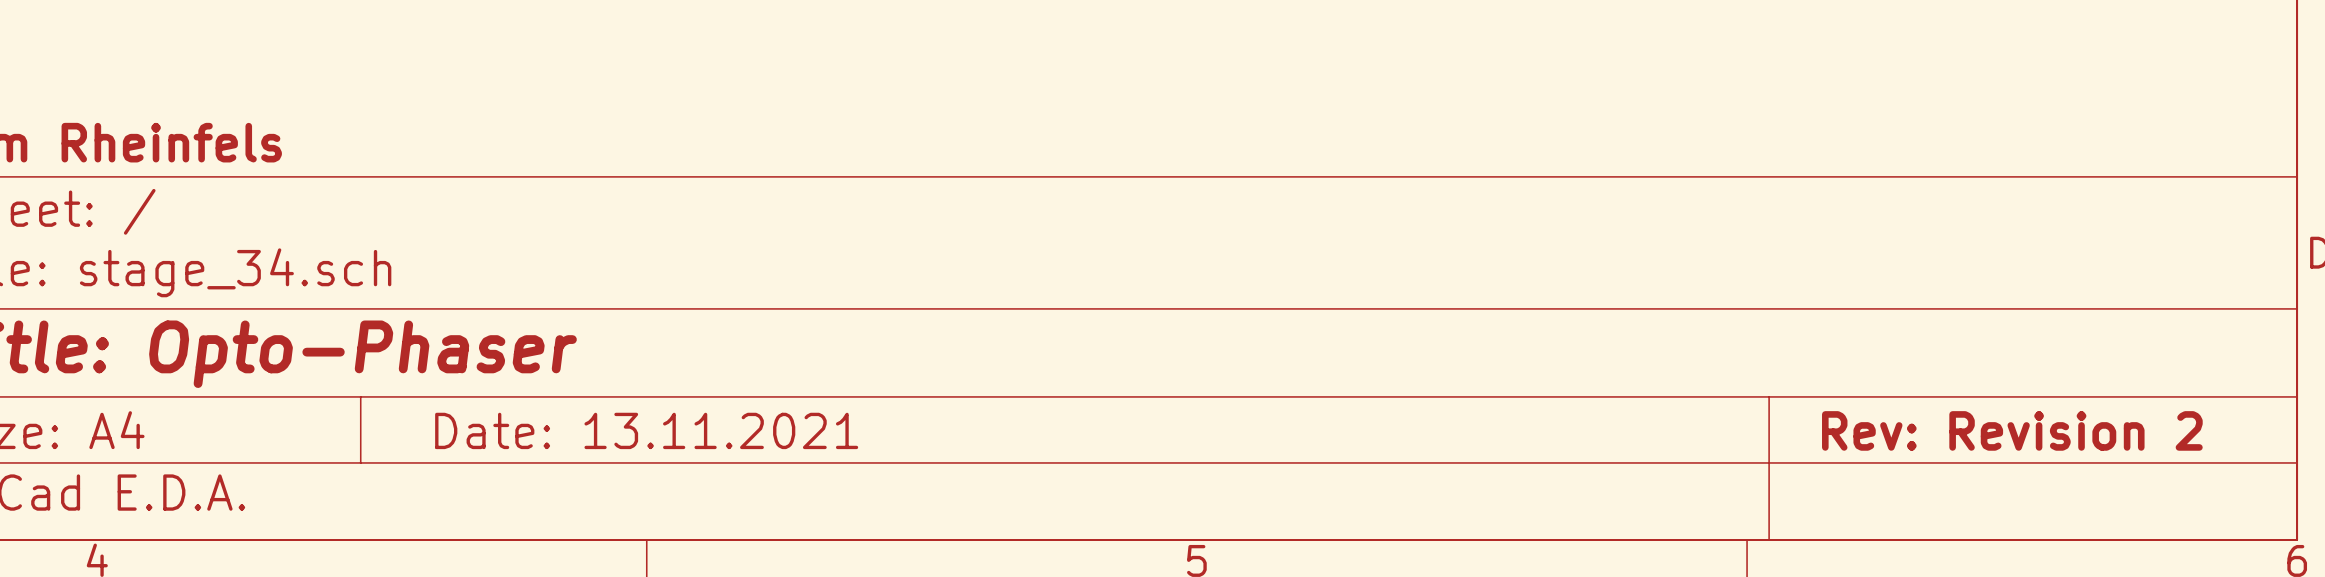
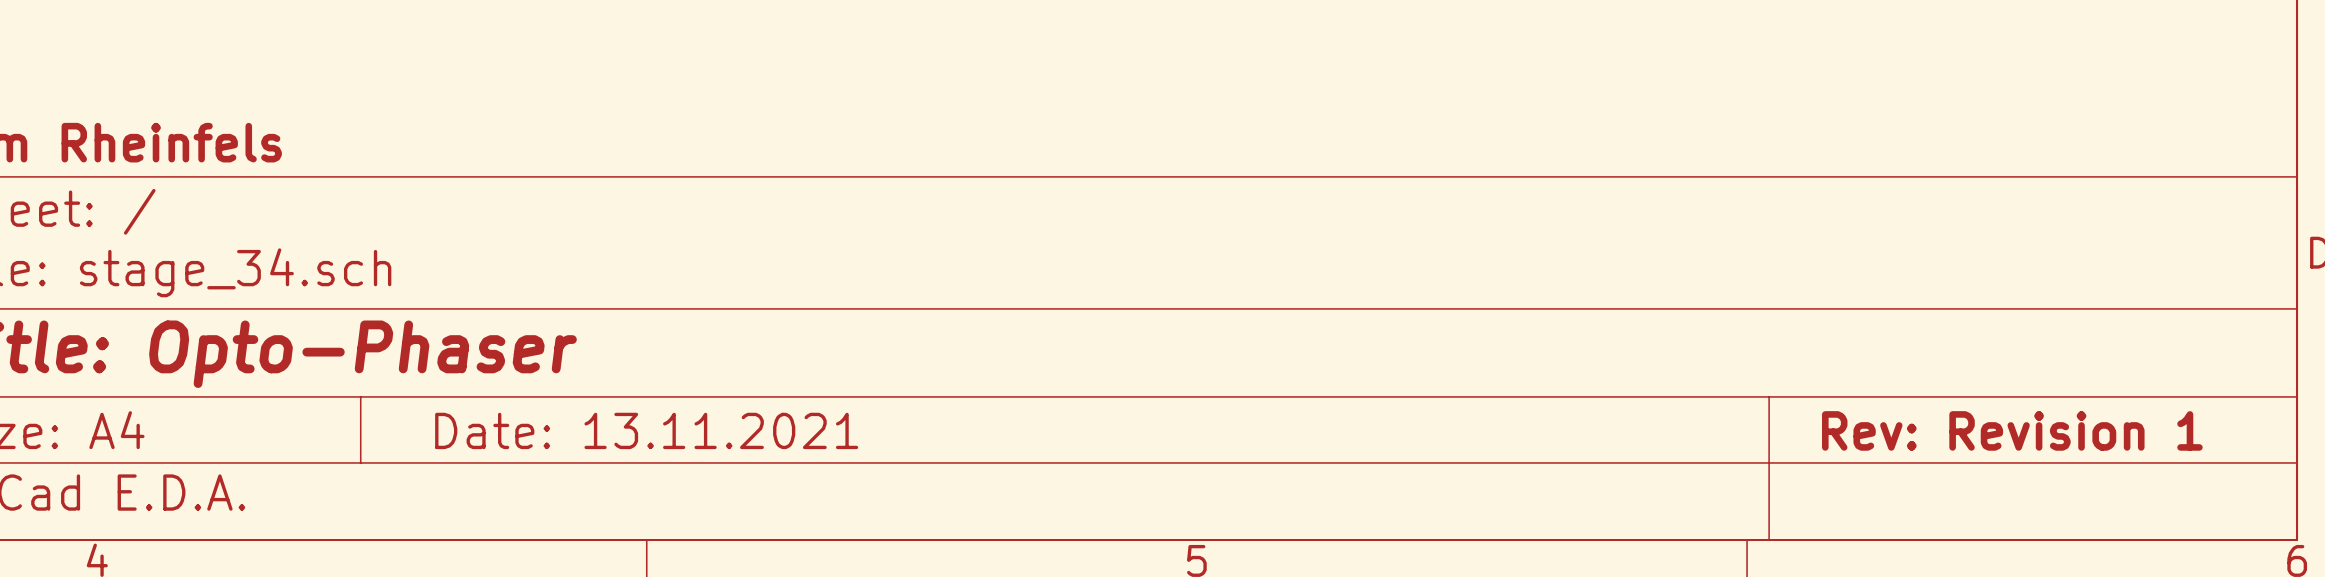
title block: Rev: Revision 2 (2012, 430) -> Rev: Revision 1 (2012, 430)

